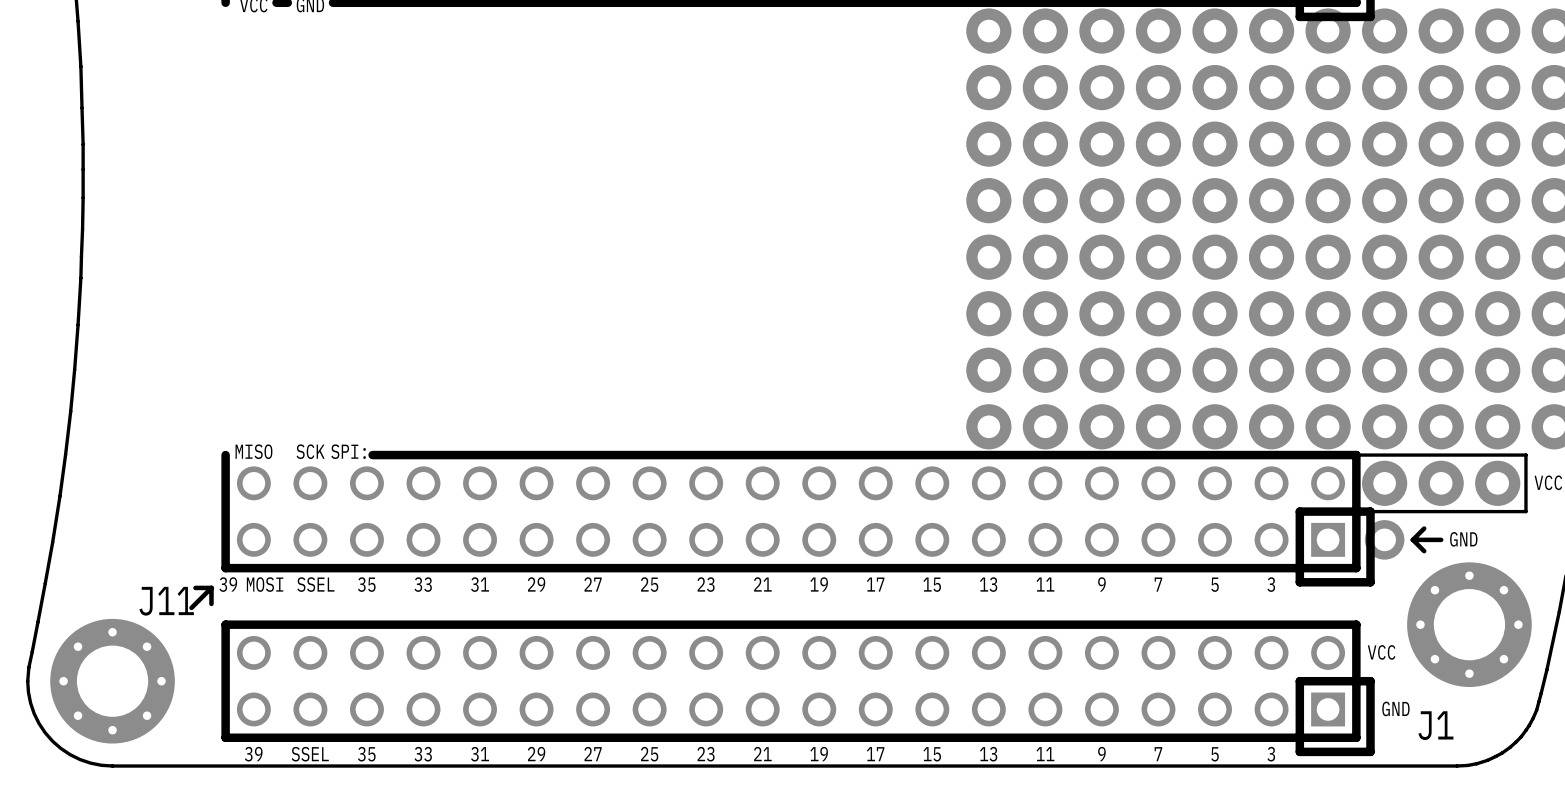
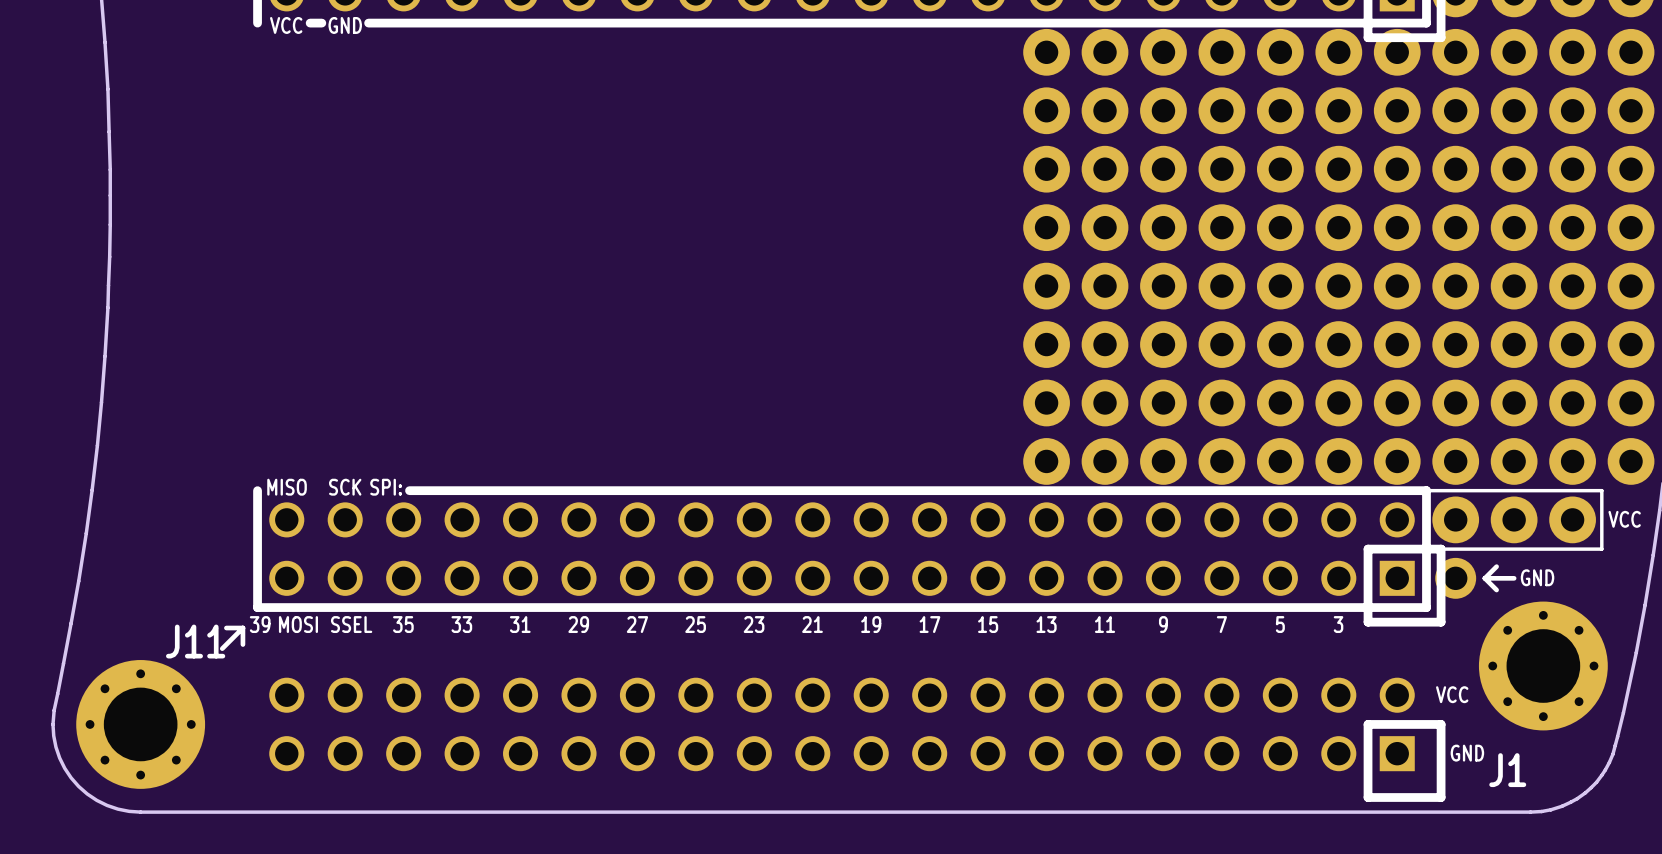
line: (1356, 624) (1356, 737) (225, 737) (225, 624) (1356, 624) -> none
text: 39 (253, 754) -> none
text: SSEL (310, 754) -> none
text: 35 (366, 754) -> none
text: 33 (423, 754) -> none
text: 31 (480, 754) -> none
text: 29 (536, 754) -> none
text: 27 (593, 754) -> none
text: 25 (649, 754) -> none
text: 23 (706, 754) -> none
text: 21 (762, 754) -> none
text: 19 (819, 754) -> none
text: 17 (875, 754) -> none
text: 15 (932, 754) -> none
text: 13 (988, 754) -> none
text: 11 (1045, 754) -> none
text: 9 (1101, 754) -> none
text: 7 (1158, 754) -> none
text: 5 (1215, 754) -> none
text: 3 (1271, 754) -> none

